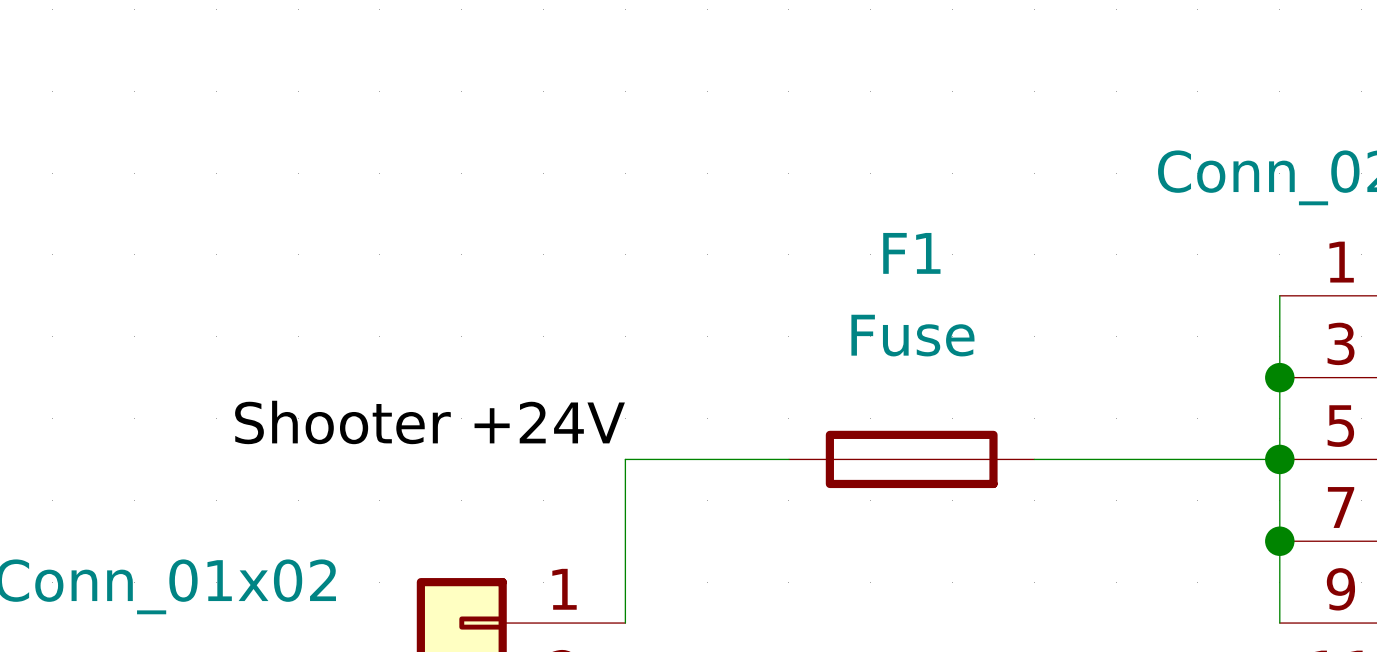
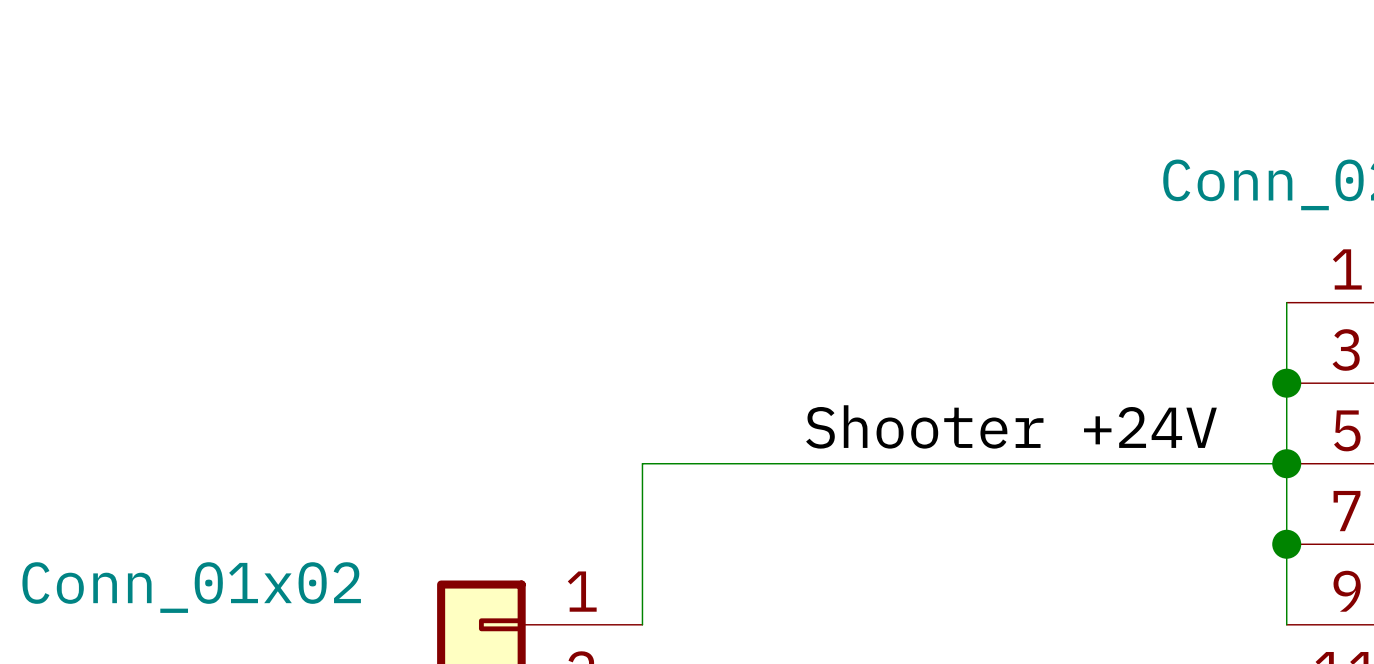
label position: Shooter +24V (430, 422) -> Shooter +24V (1011, 426)
F1: Fuse (911, 459) -> none

